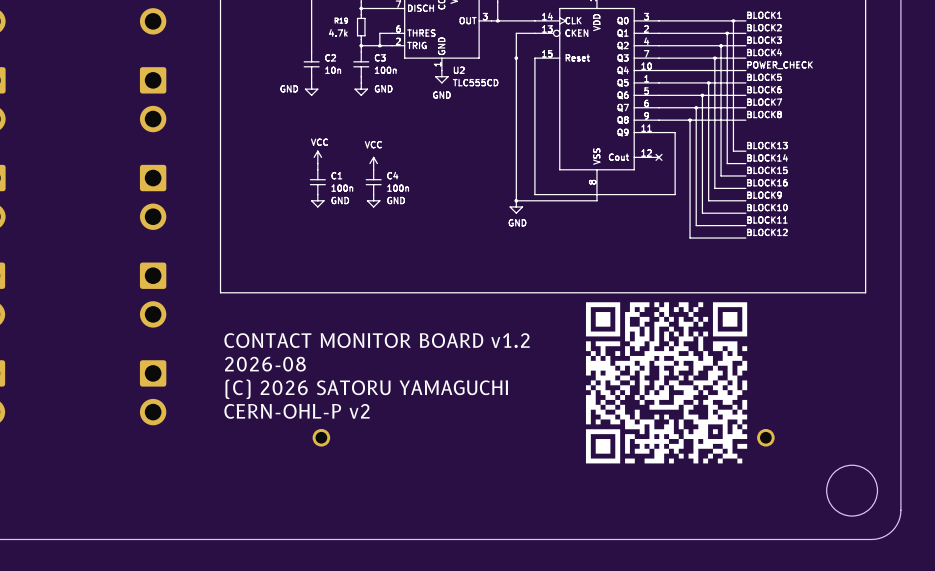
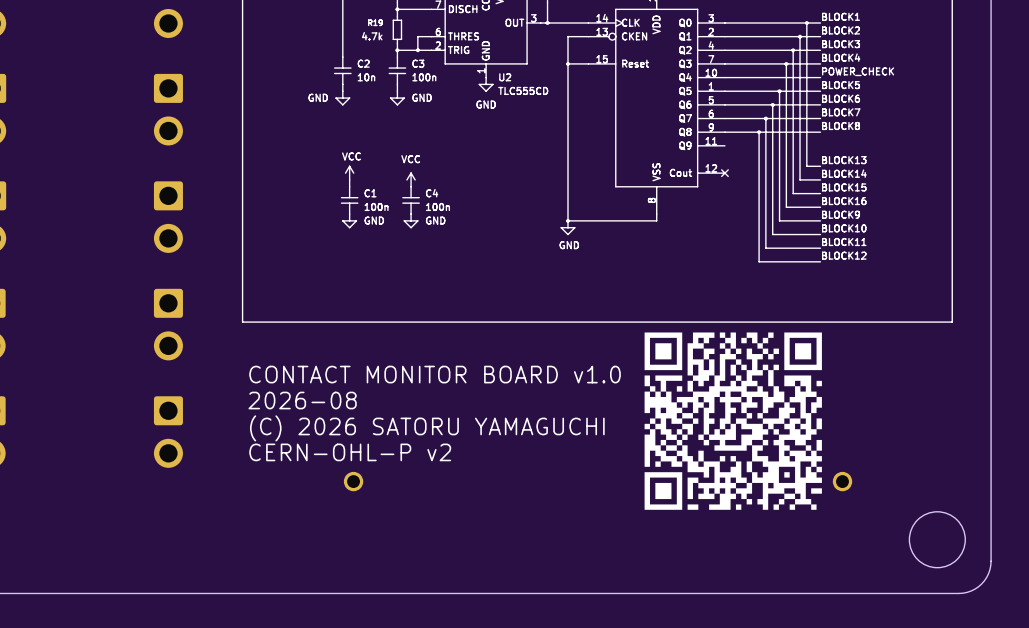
line: (534, 58) (534, 194) (675, 194) (675, 132) (659, 132) -> (588, 63) (567, 63)
text: CONTACT MONITOR BOARD v1.2 (377, 340) -> CONTACT MONITOR BOARD v1.0 (435, 374)

